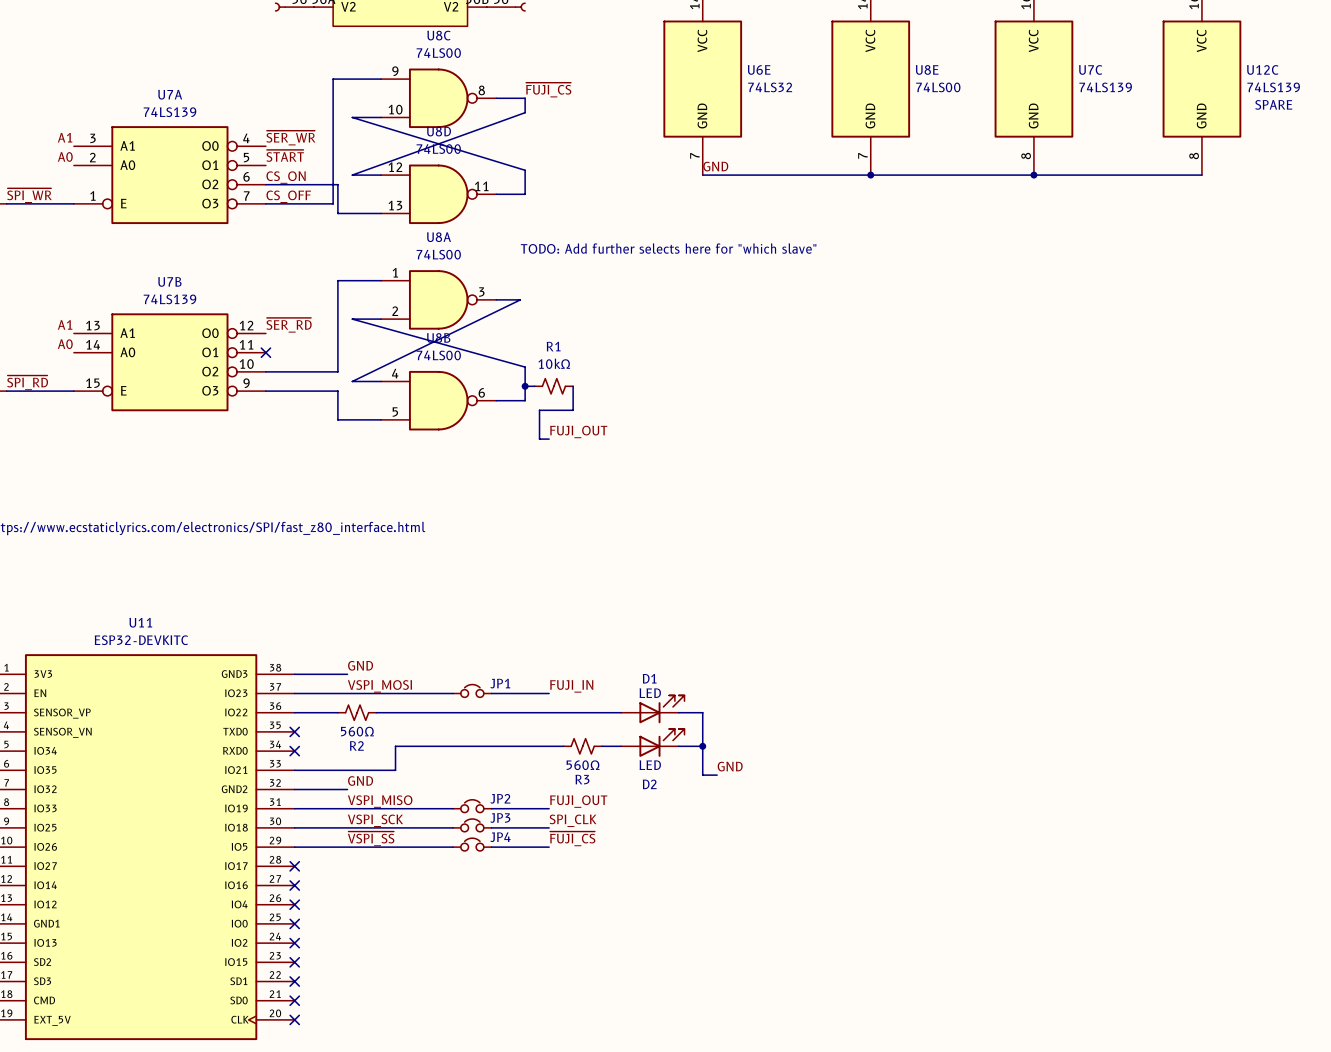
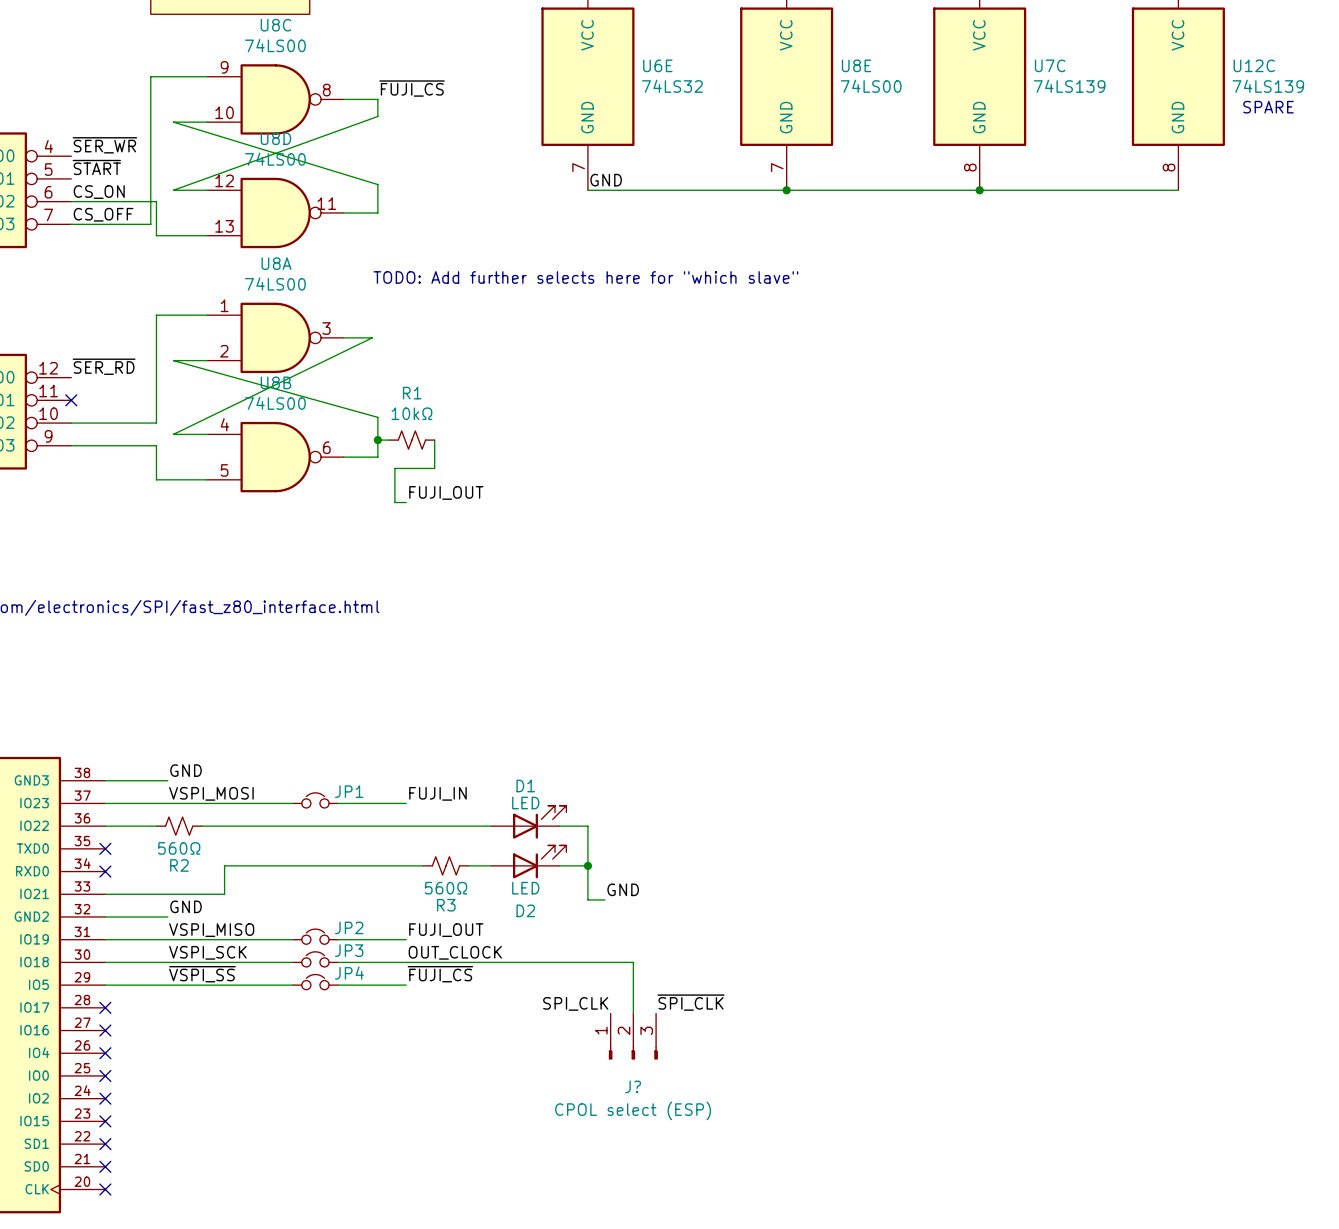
label: SPI_CLK (573, 820) -> OUT_CLOCK (455, 952)
wire: none -> (406, 962) (633, 962) (633, 1013)
label: none -> ~{SPI_CLK} (691, 1002)
label: none -> SPI_CLK (575, 1003)
J?: none -> CPOL select (ESP) (633, 1036)

